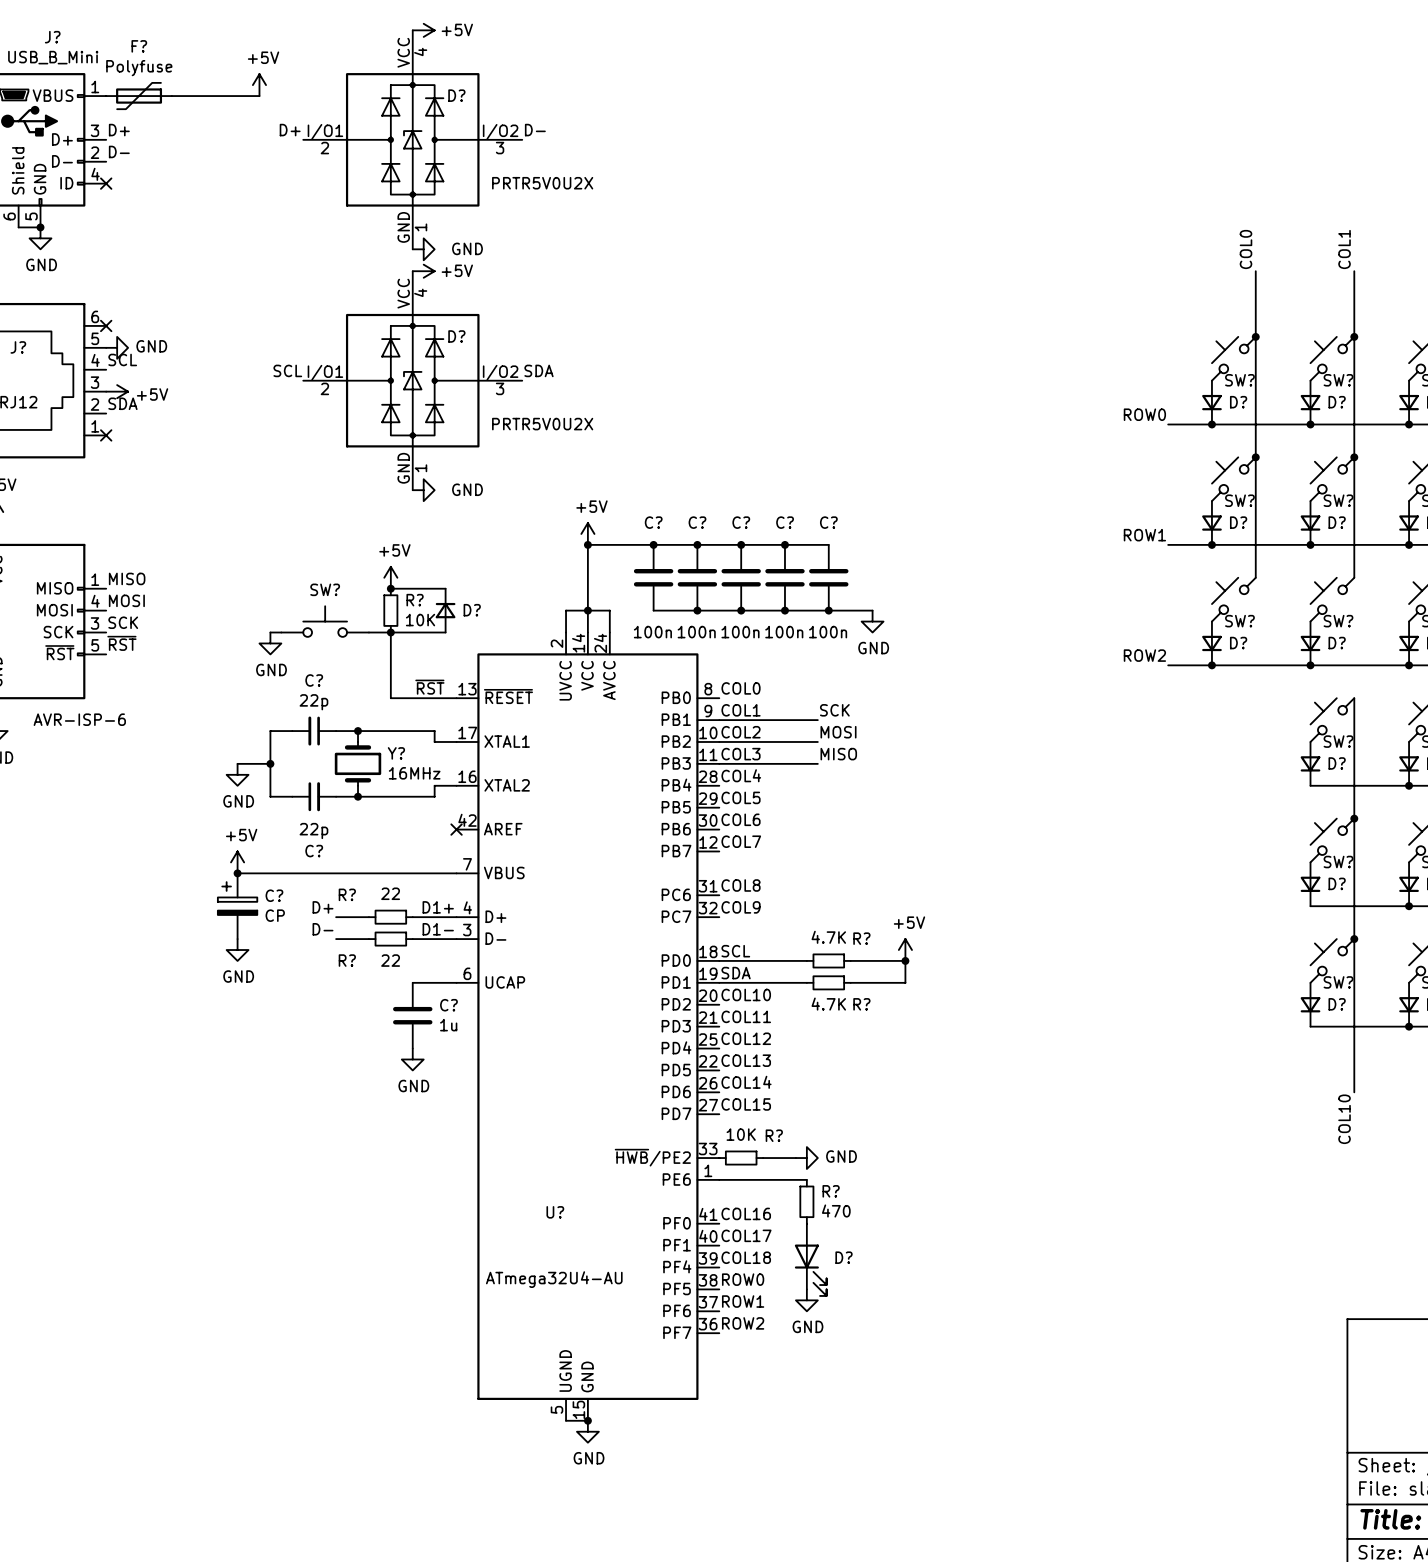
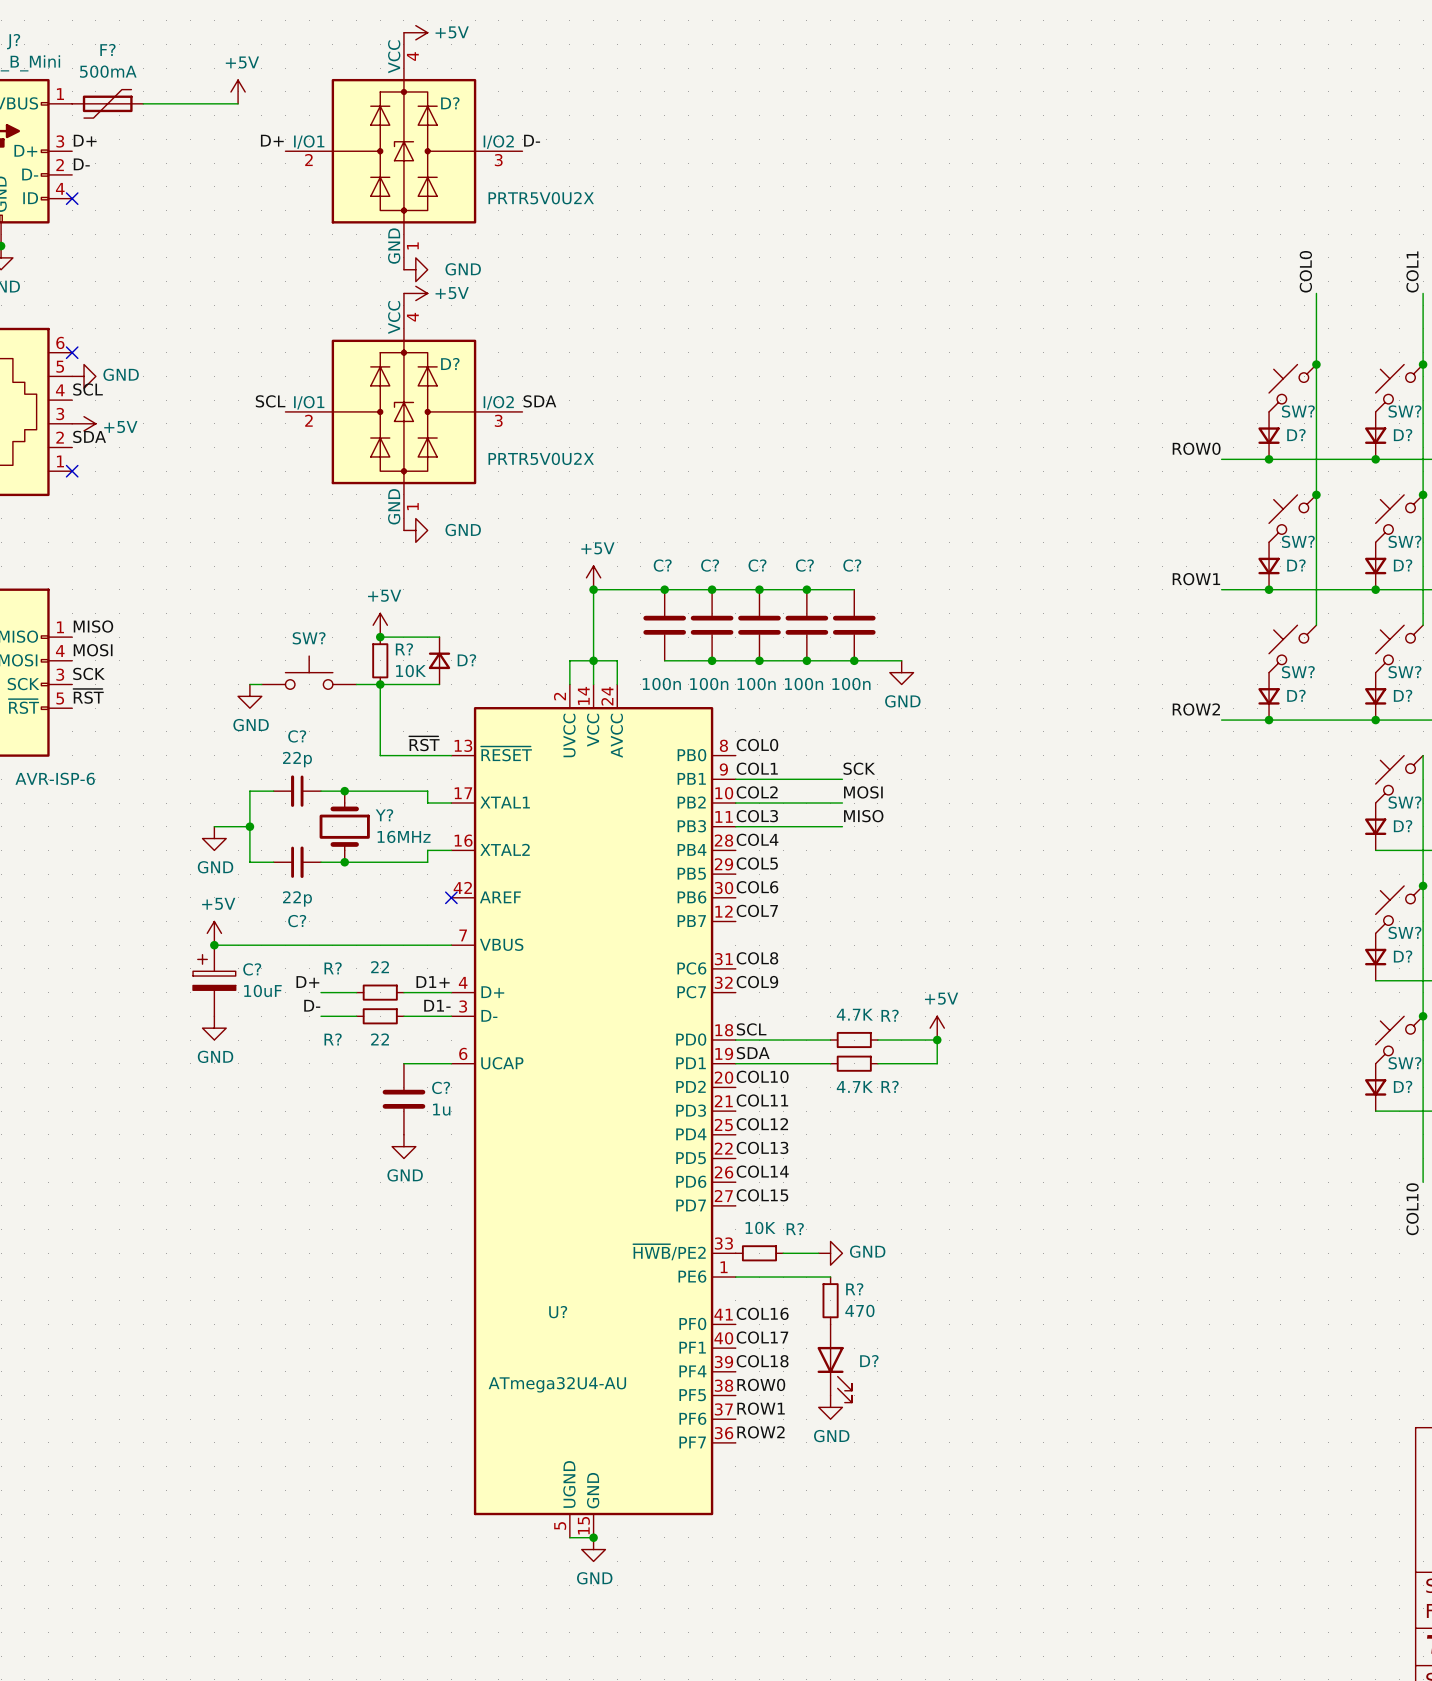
F? value: Polyfuse (139, 68) -> 500mA (108, 71)
C? value: CP (275, 915) -> 10uF (262, 990)

